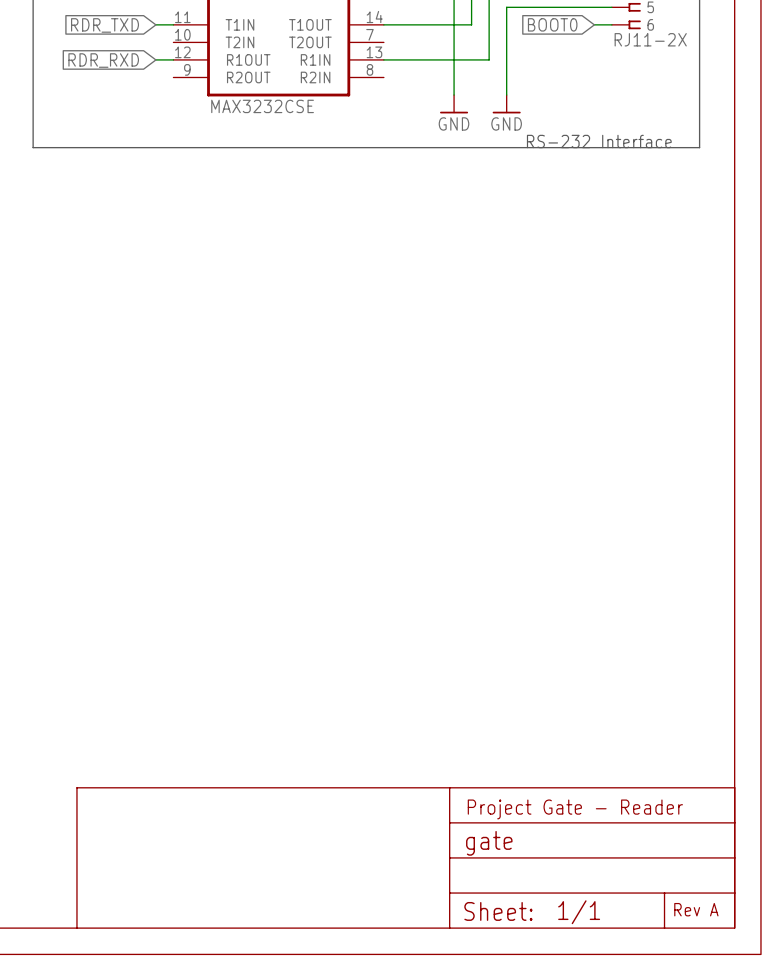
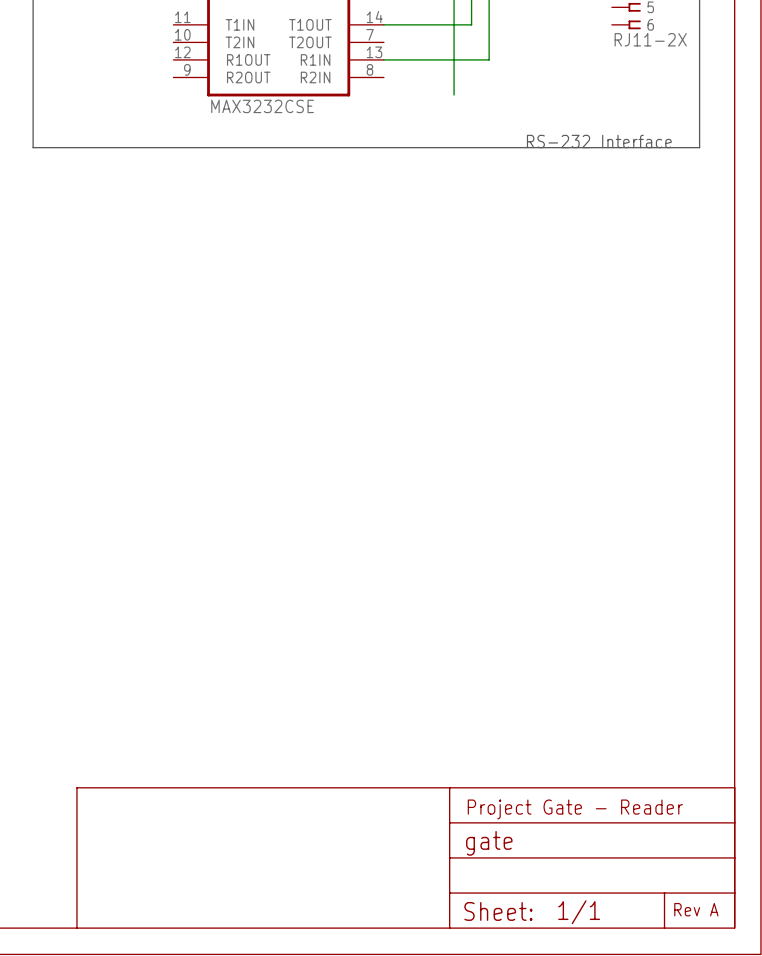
wire: (611, 7) (506, 7) (506, 95) -> none
wire: (155, 24) (173, 24) -> none
global label: BOOT0 (552, 24) -> none
wire: (594, 24) (611, 24) -> none
global label: RDR_TXD (105, 25) -> none
wire: (155, 59) (173, 59) -> none
global label: RDR_RXD (103, 60) -> none
power symbol: GND (454, 104) -> none
power symbol: GND (506, 104) -> none

